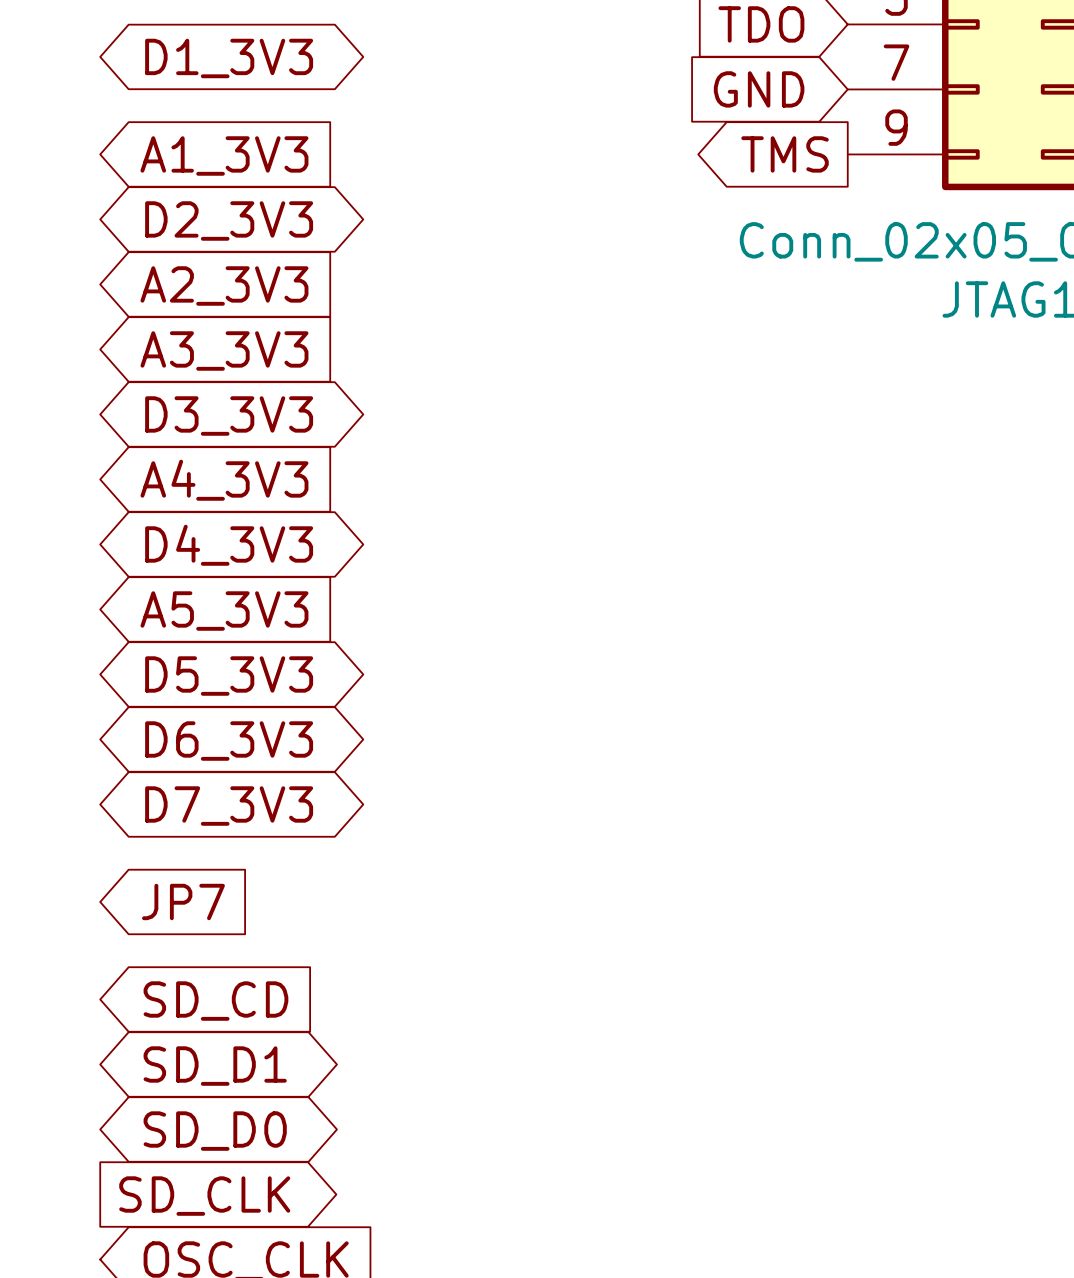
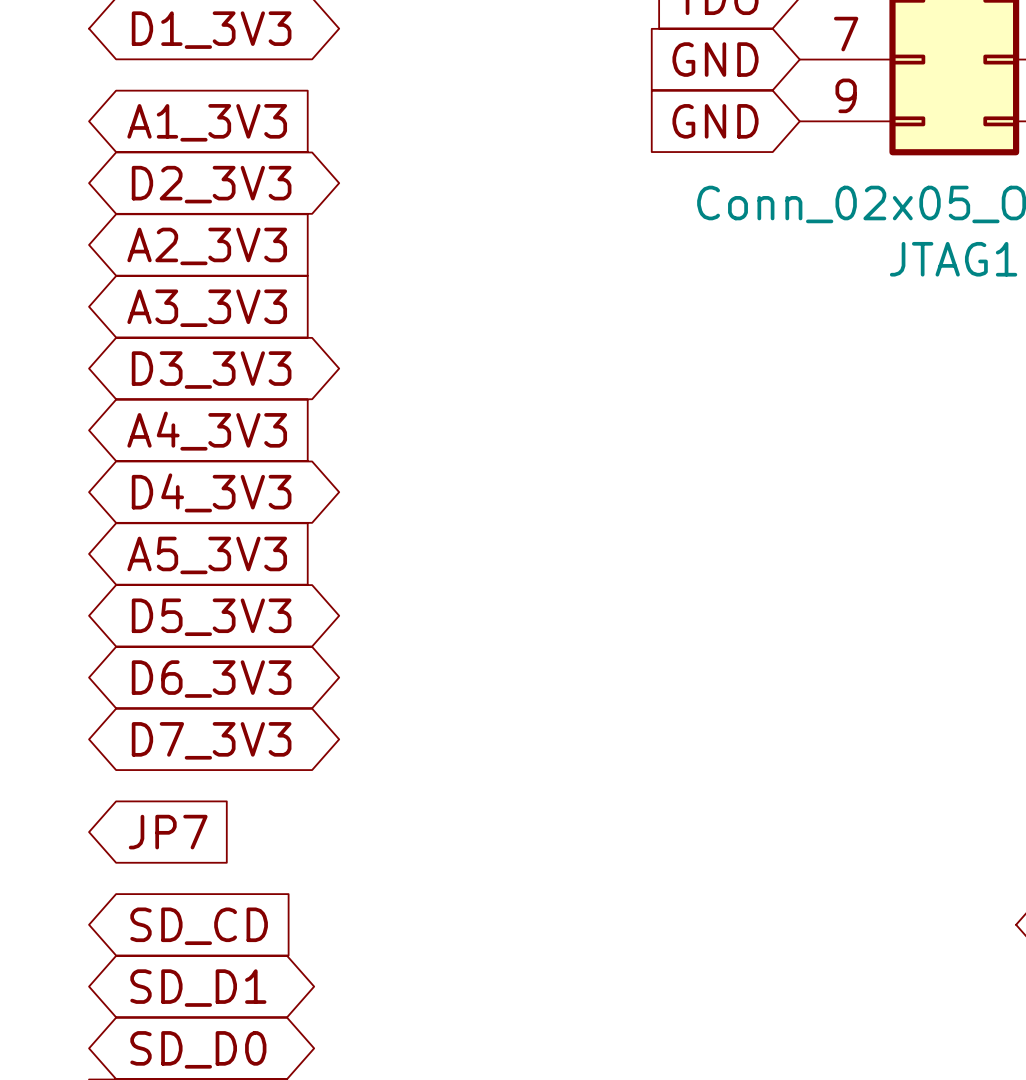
global label shape: output (785, 154) -> input (715, 121)
global label: TMS (785, 154) -> GND (715, 121)

